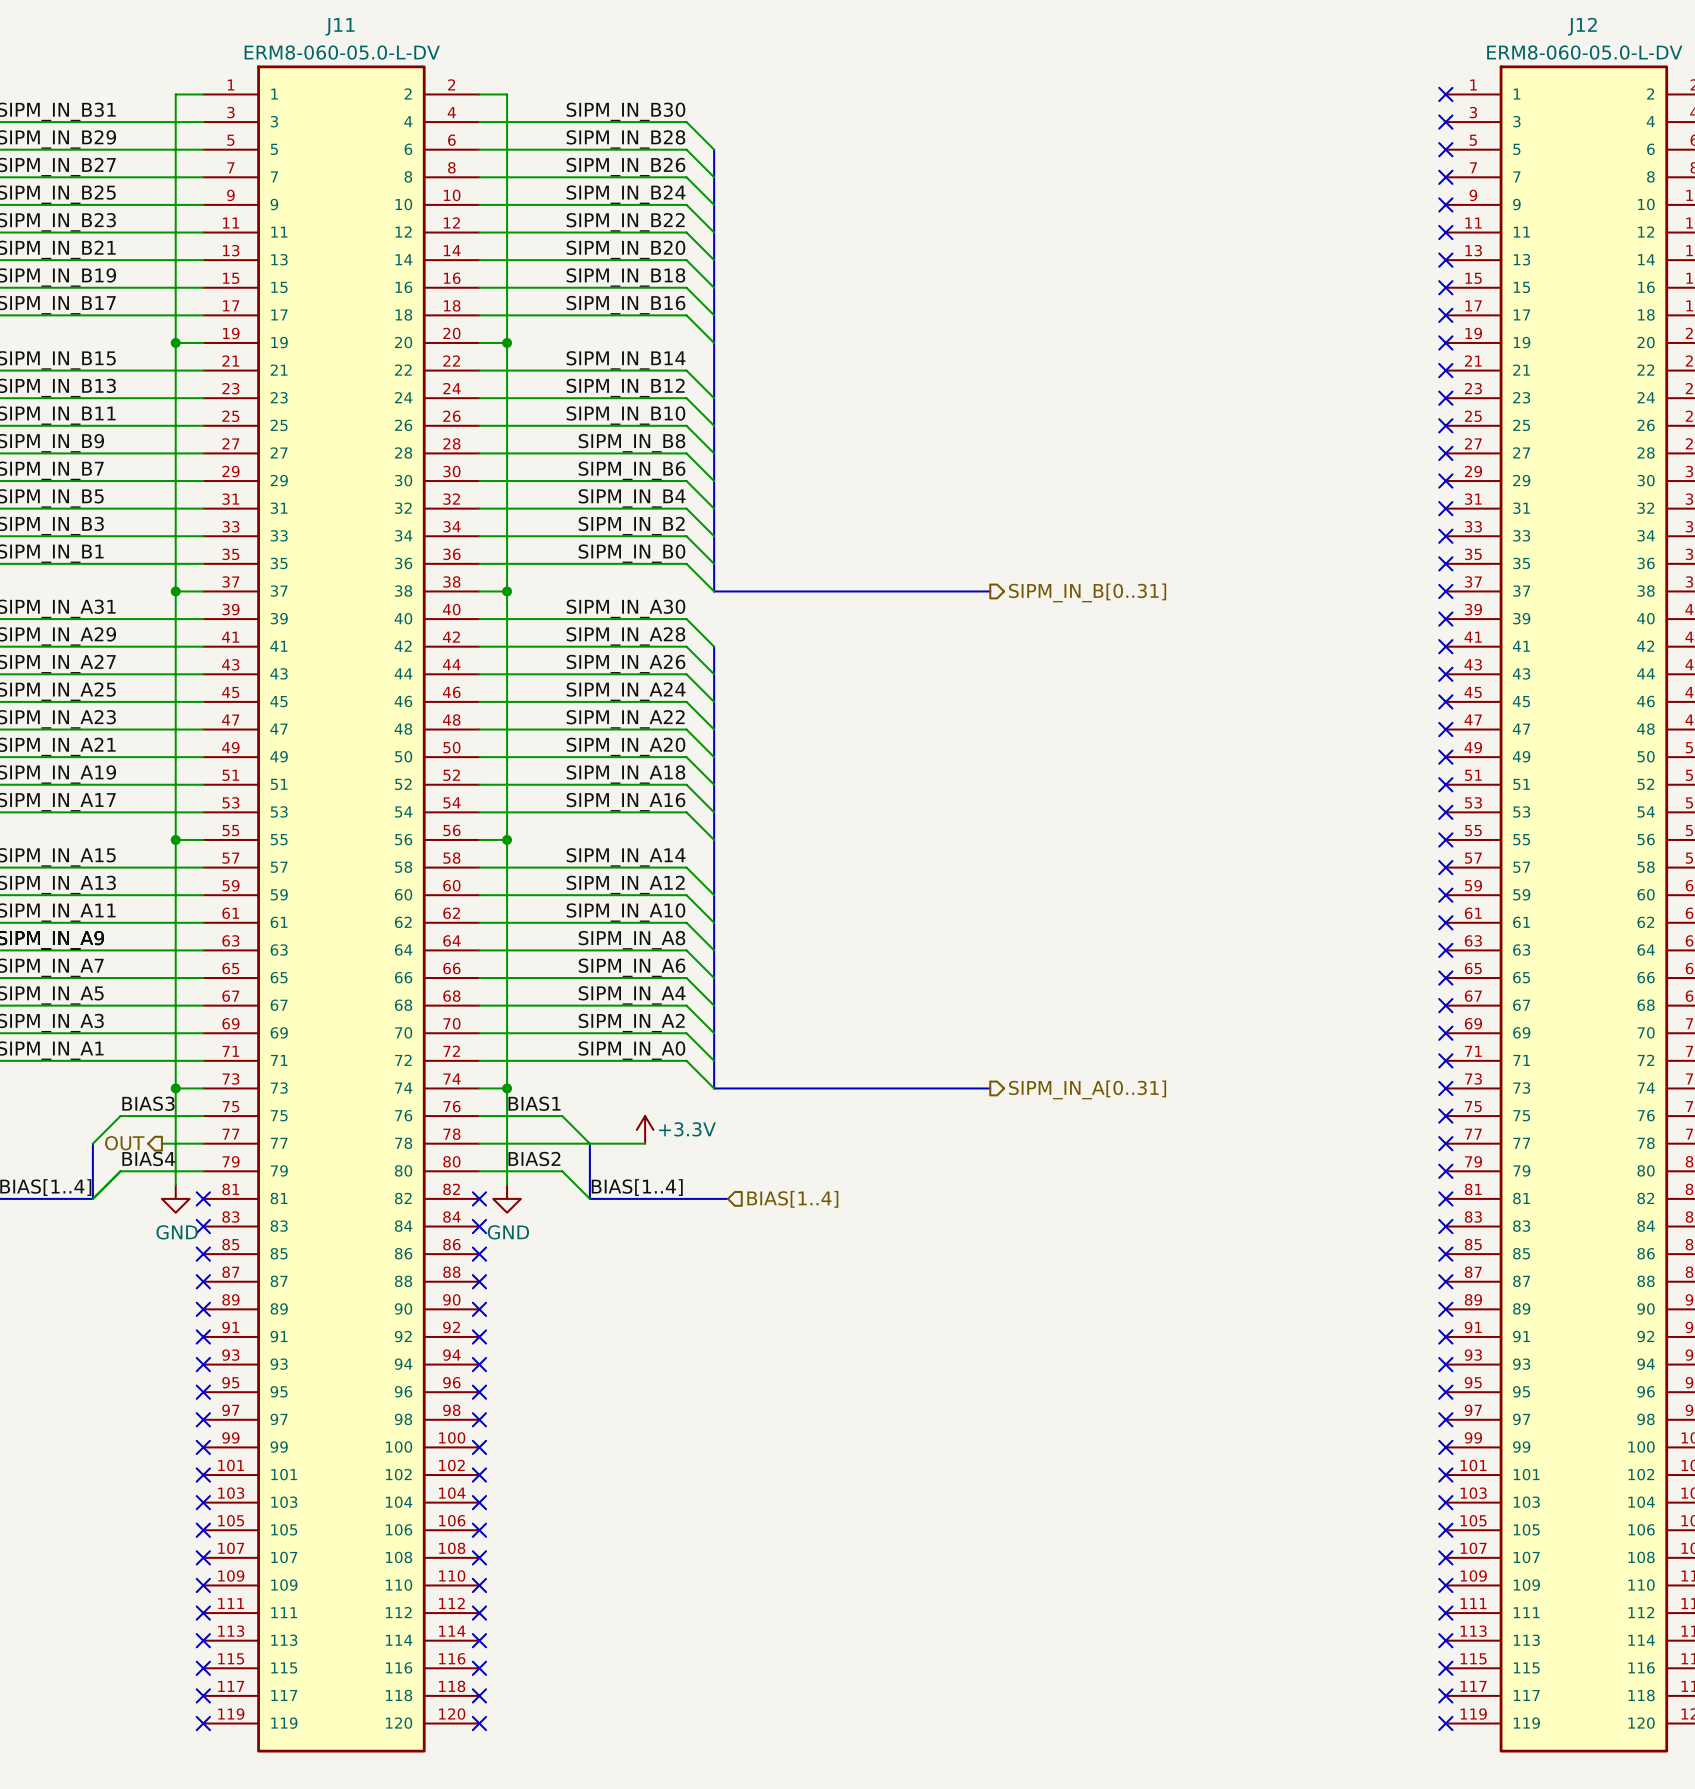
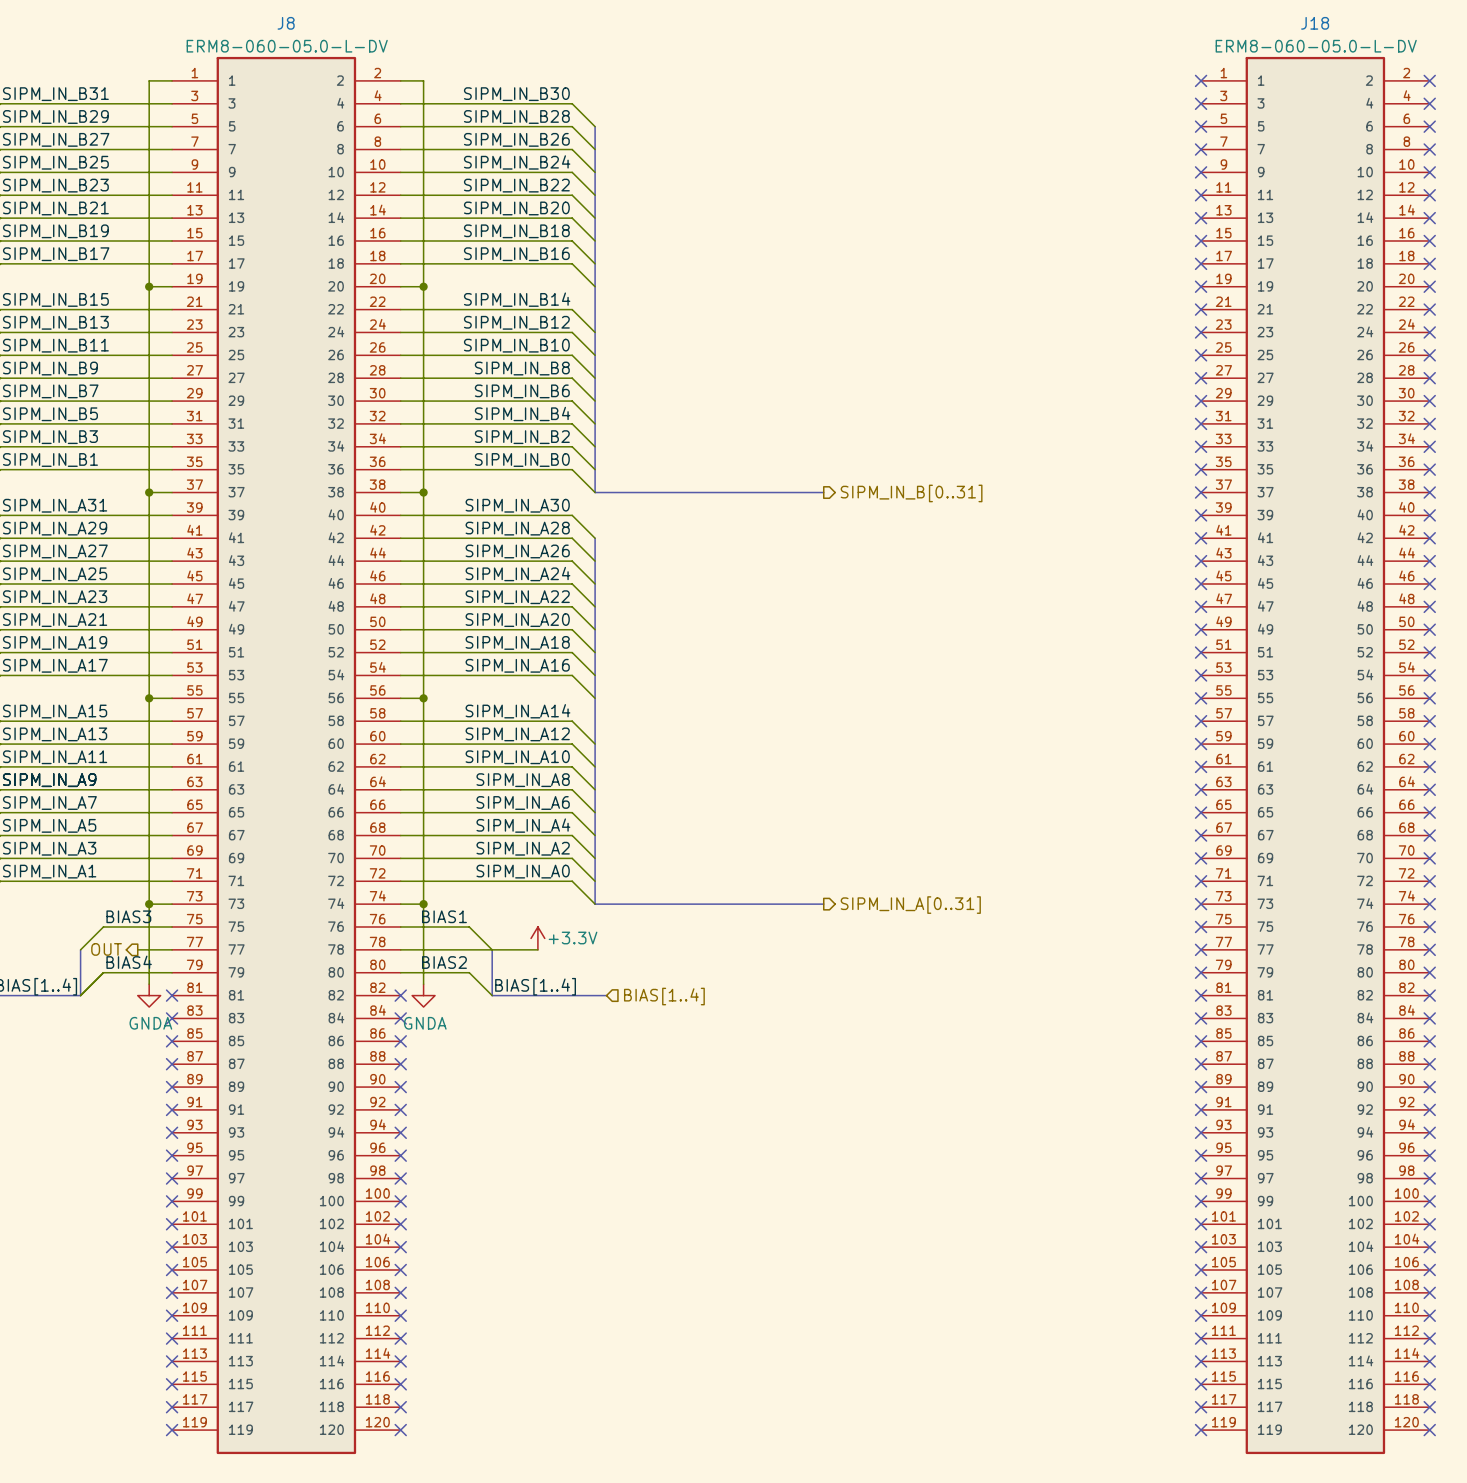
J11 name: J11 (340, 26) -> J8 (286, 23)
J12 name: J12 (1582, 26) -> J18 (1315, 23)
power symbol: GND (175, 1198) -> GNDA (149, 995)
power symbol: GND (507, 1198) -> GNDA (423, 995)

